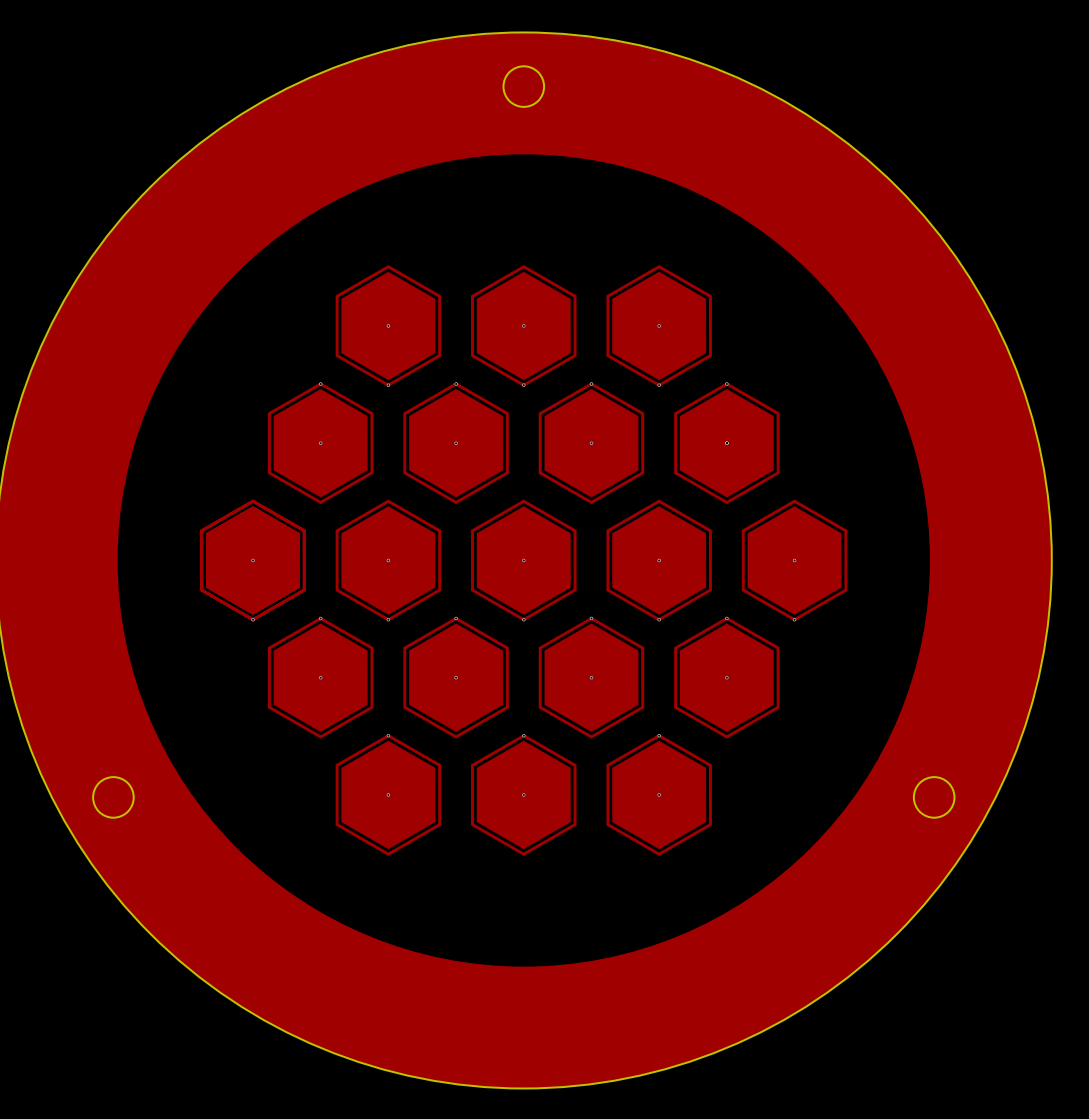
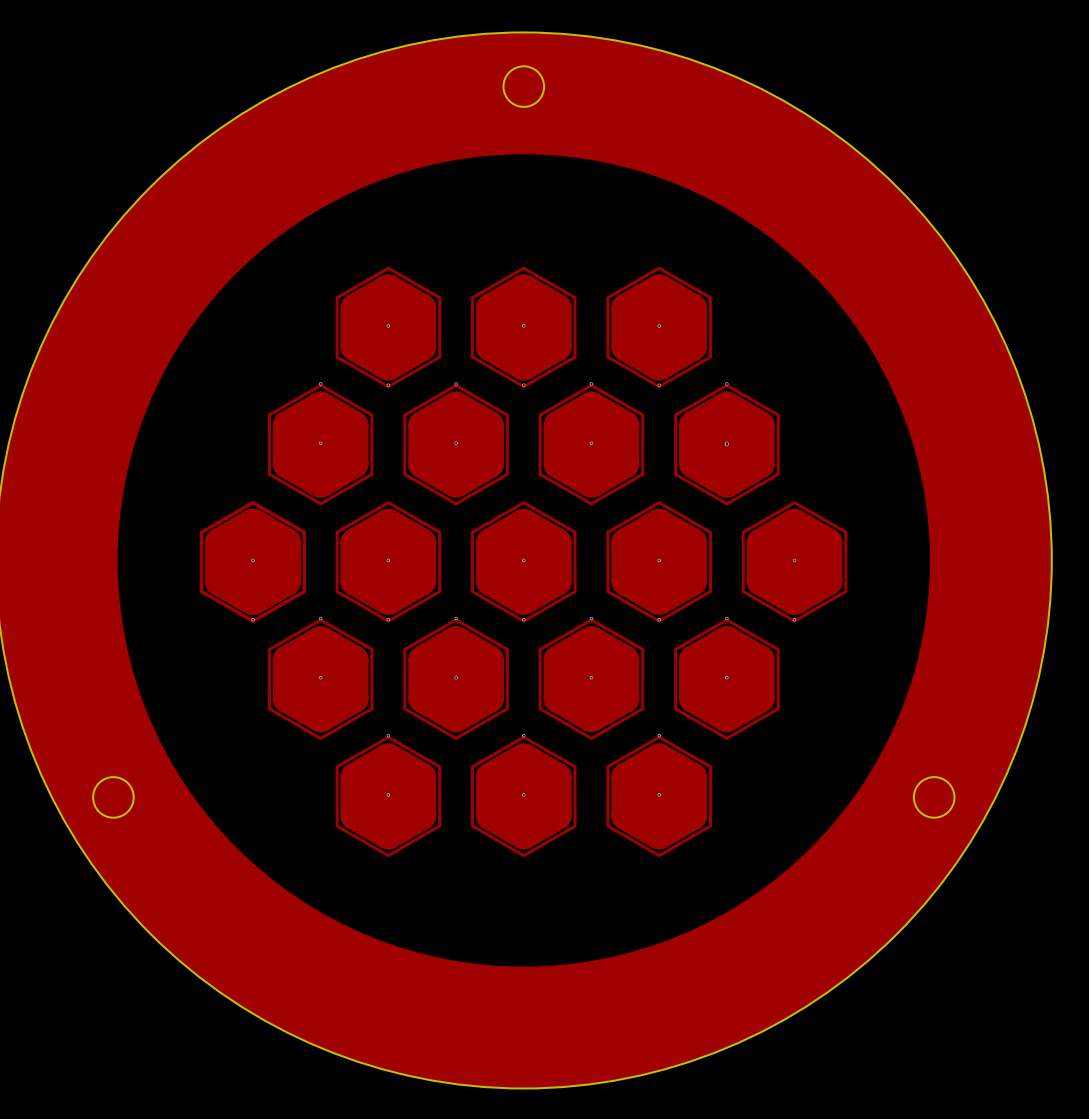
drawing shape: [335, 265, 442, 387] -> [335, 266, 442, 389]
drawing shape: [471, 265, 577, 387] -> [471, 266, 577, 389]
drawing shape: [606, 265, 712, 387] -> [606, 266, 712, 389]
drawing shape: [267, 382, 374, 505] -> [267, 383, 374, 506]
drawing shape: [403, 382, 509, 505] -> [403, 383, 509, 506]
drawing shape: [538, 382, 645, 505] -> [538, 383, 645, 506]
drawing shape: [674, 382, 780, 505] -> [674, 383, 780, 506]
via: none -> (726, 444)
drawing shape: [200, 499, 306, 622] -> [200, 500, 306, 623]
drawing shape: [335, 499, 442, 622] -> [335, 500, 442, 623]
drawing shape: [471, 499, 577, 622] -> [471, 500, 577, 623]
drawing shape: [606, 499, 712, 622] -> [606, 500, 712, 623]
drawing shape: [741, 499, 848, 622] -> [741, 500, 848, 623]
drawing shape: [267, 616, 374, 739] -> [267, 618, 374, 741]
drawing shape: [403, 616, 509, 739] -> [403, 618, 509, 741]
drawing shape: [538, 616, 645, 739] -> [538, 618, 645, 741]
drawing shape: [674, 616, 780, 739] -> [674, 618, 780, 741]
drawing shape: [335, 734, 442, 856] -> [335, 735, 442, 858]
drawing shape: [471, 734, 577, 856] -> [471, 735, 577, 858]
drawing shape: [606, 734, 712, 856] -> [606, 735, 712, 858]

